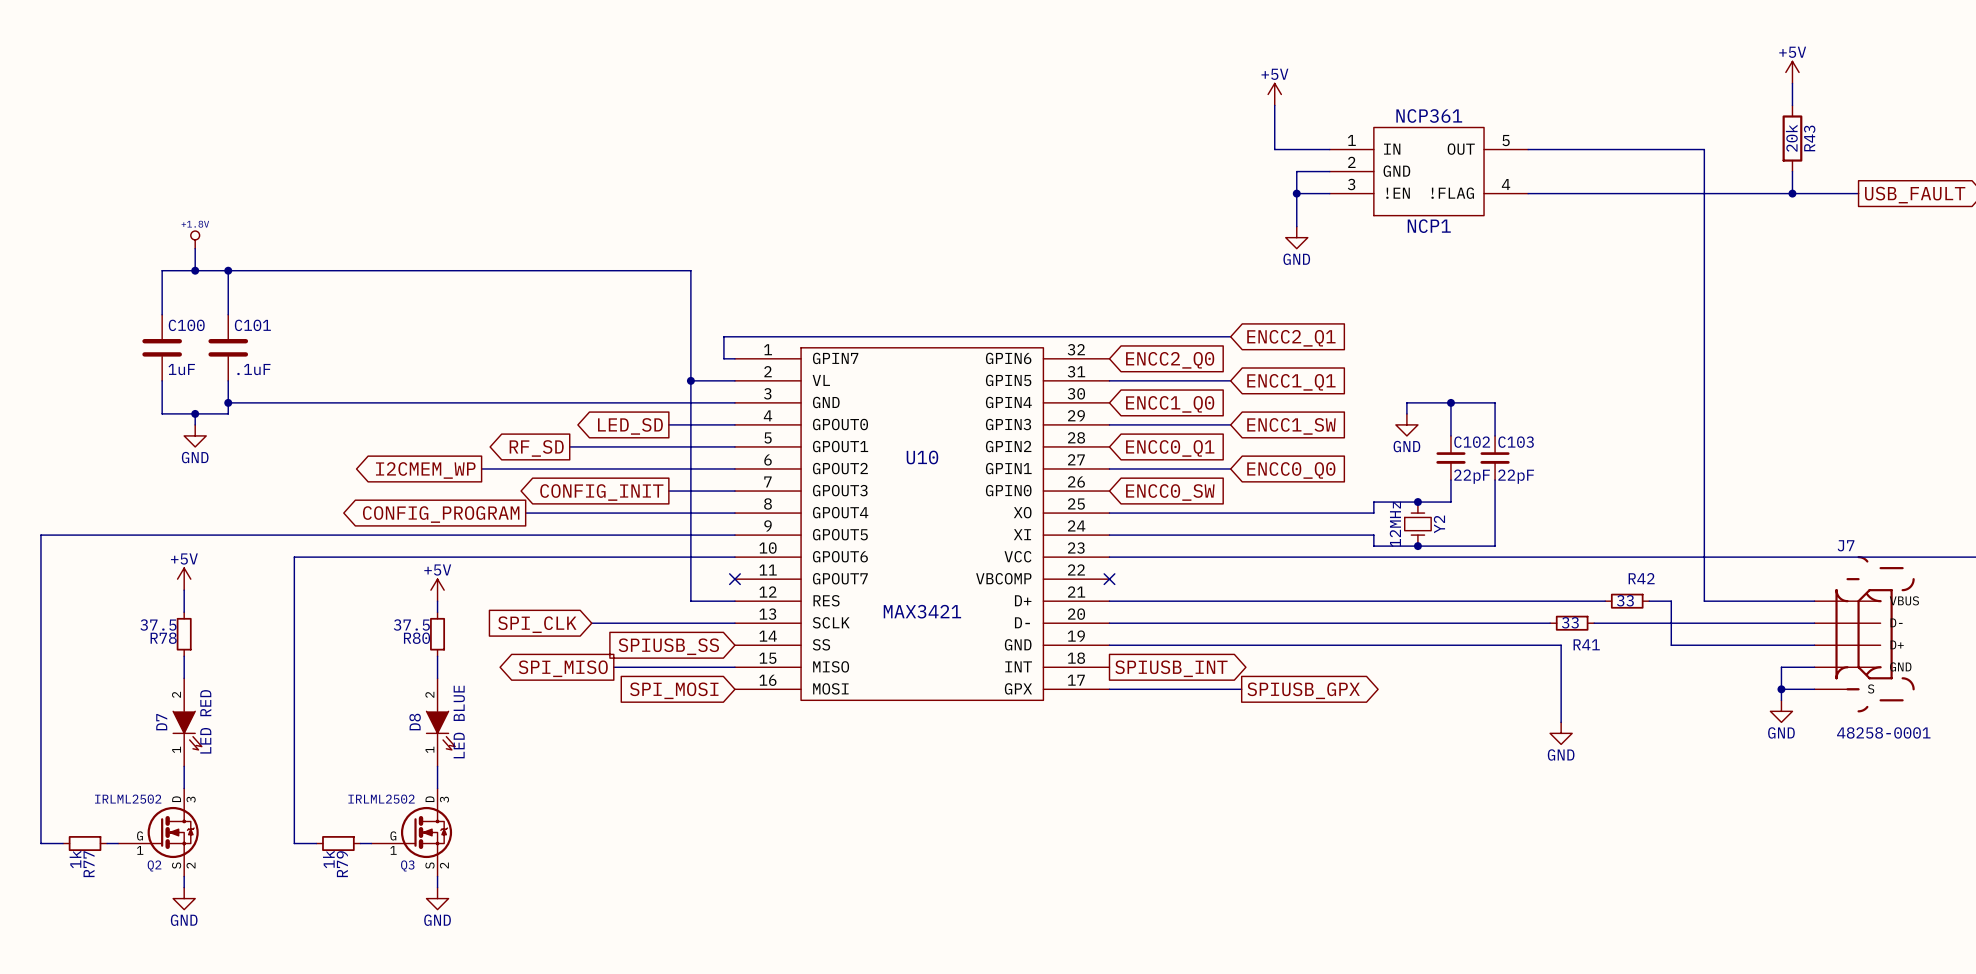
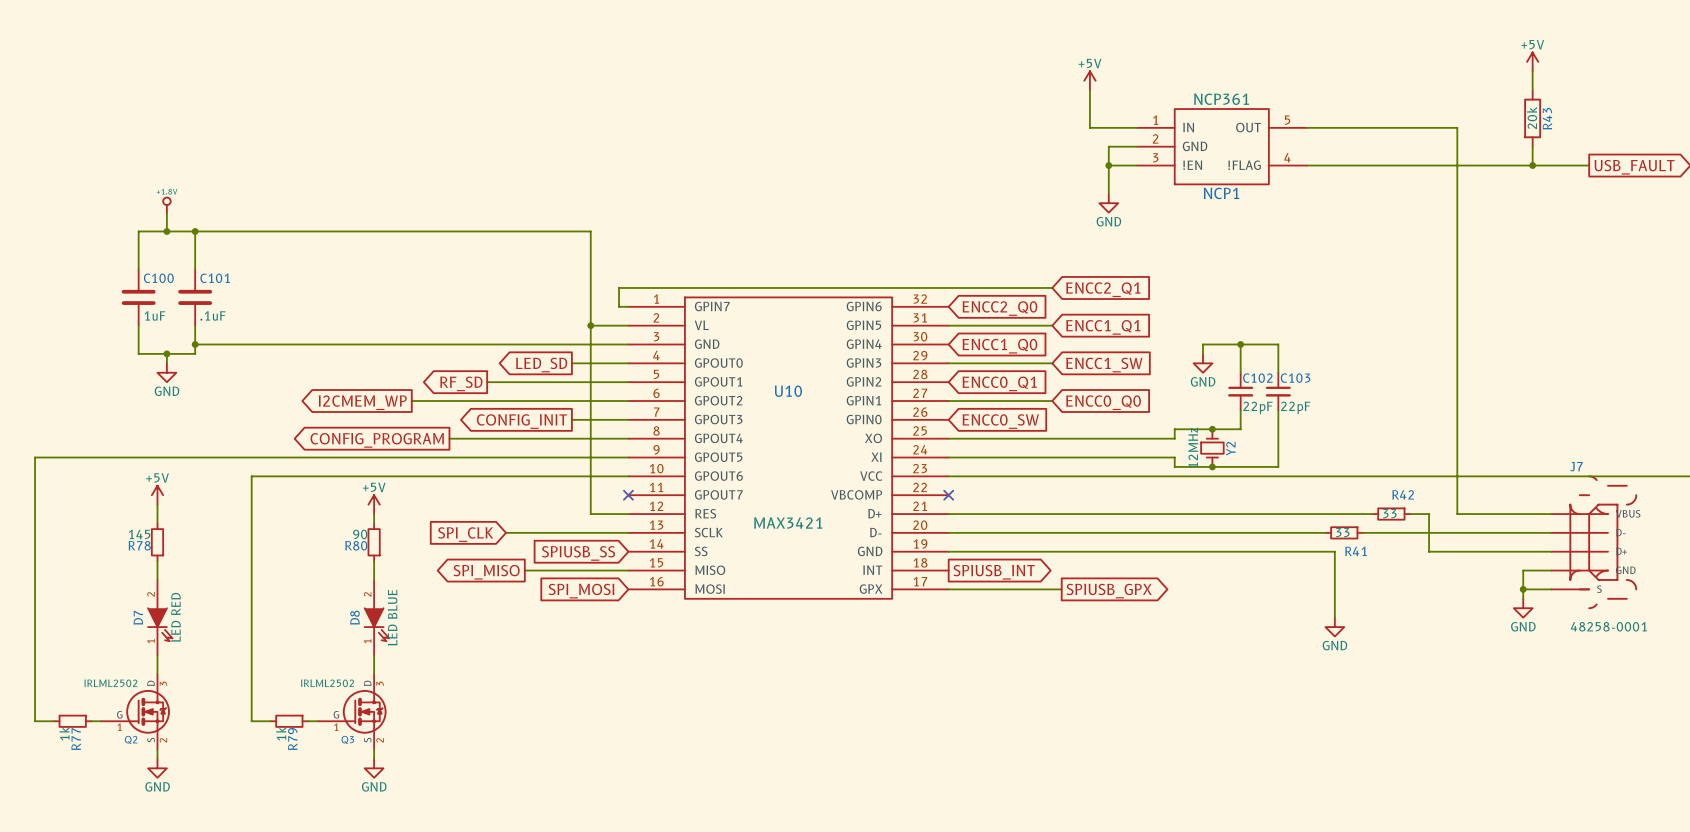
R78 value: 37.5 (158, 625) -> 145 (139, 534)
R80 value: 37.5 (411, 625) -> 90 (360, 534)

